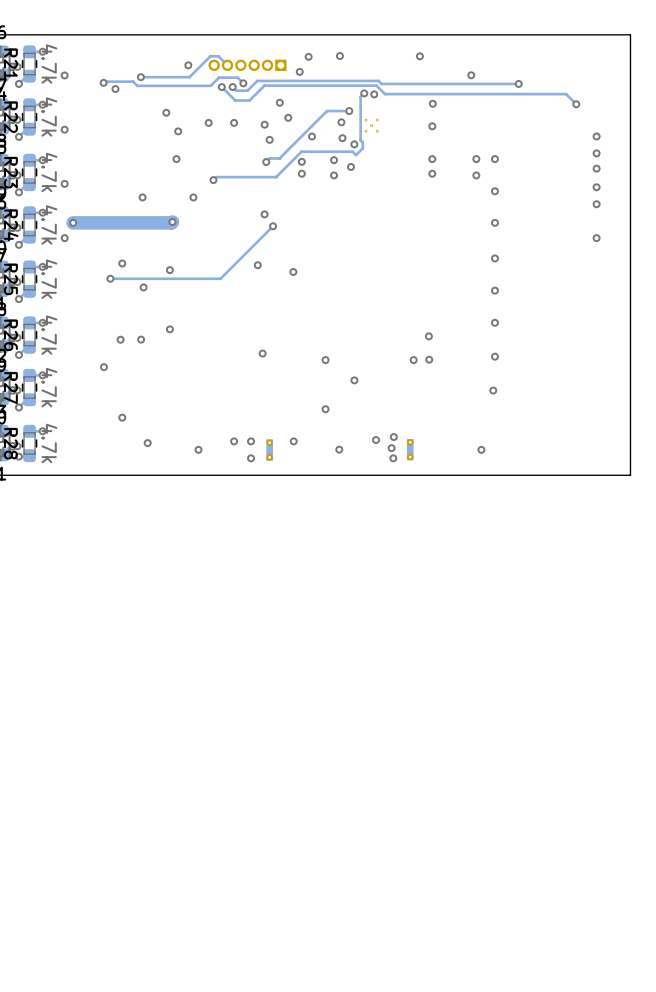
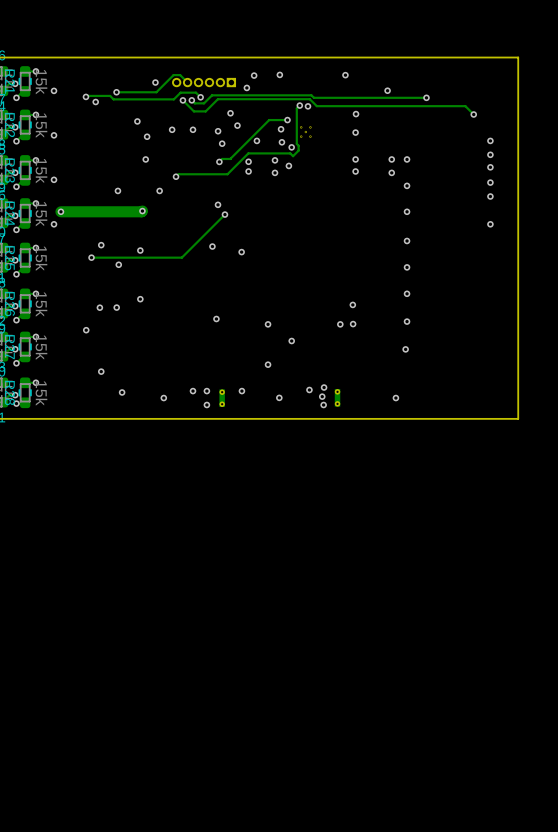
R21 value: 4.7k (49, 64) -> 15k (41, 82)
R22 value: 4.7k (49, 116) -> 15k (41, 125)
R23 value: 4.7k (49, 172) -> 15k (41, 171)
R24 value: 4.7k (49, 224) -> 15k (41, 214)
R25 value: 4.7k (49, 279) -> 15k (41, 258)
R26 value: 4.7k (49, 335) -> 15k (41, 304)
R27 value: 4.7k (49, 387) -> 15k (41, 347)
R28 value: 4.7k (49, 443) -> 15k (41, 393)

